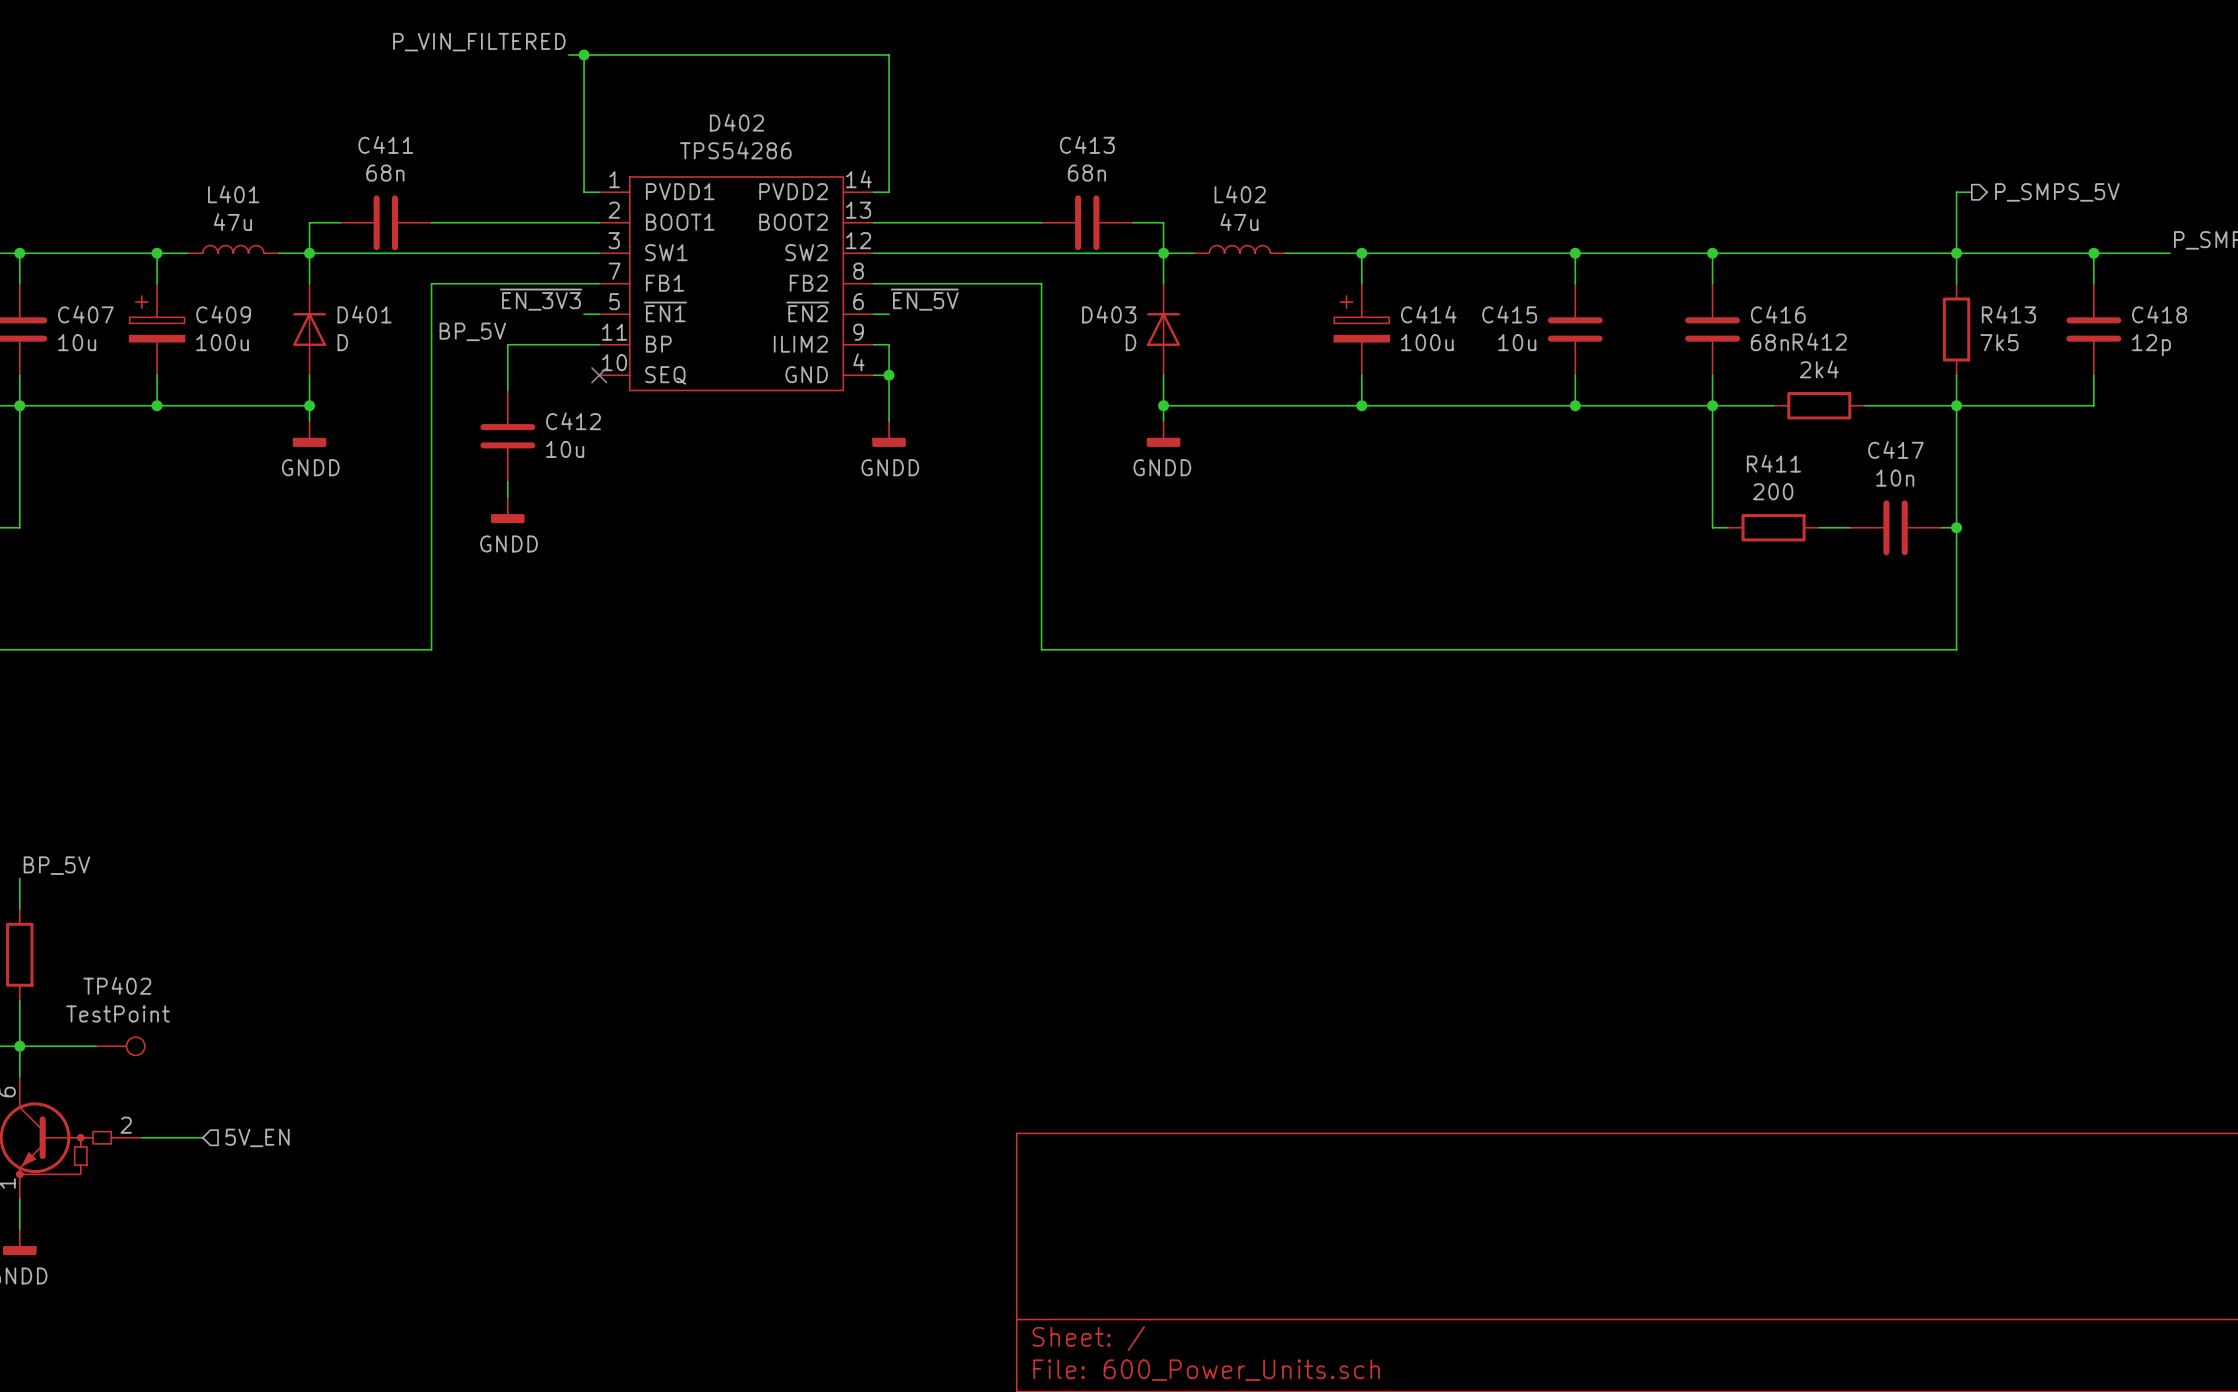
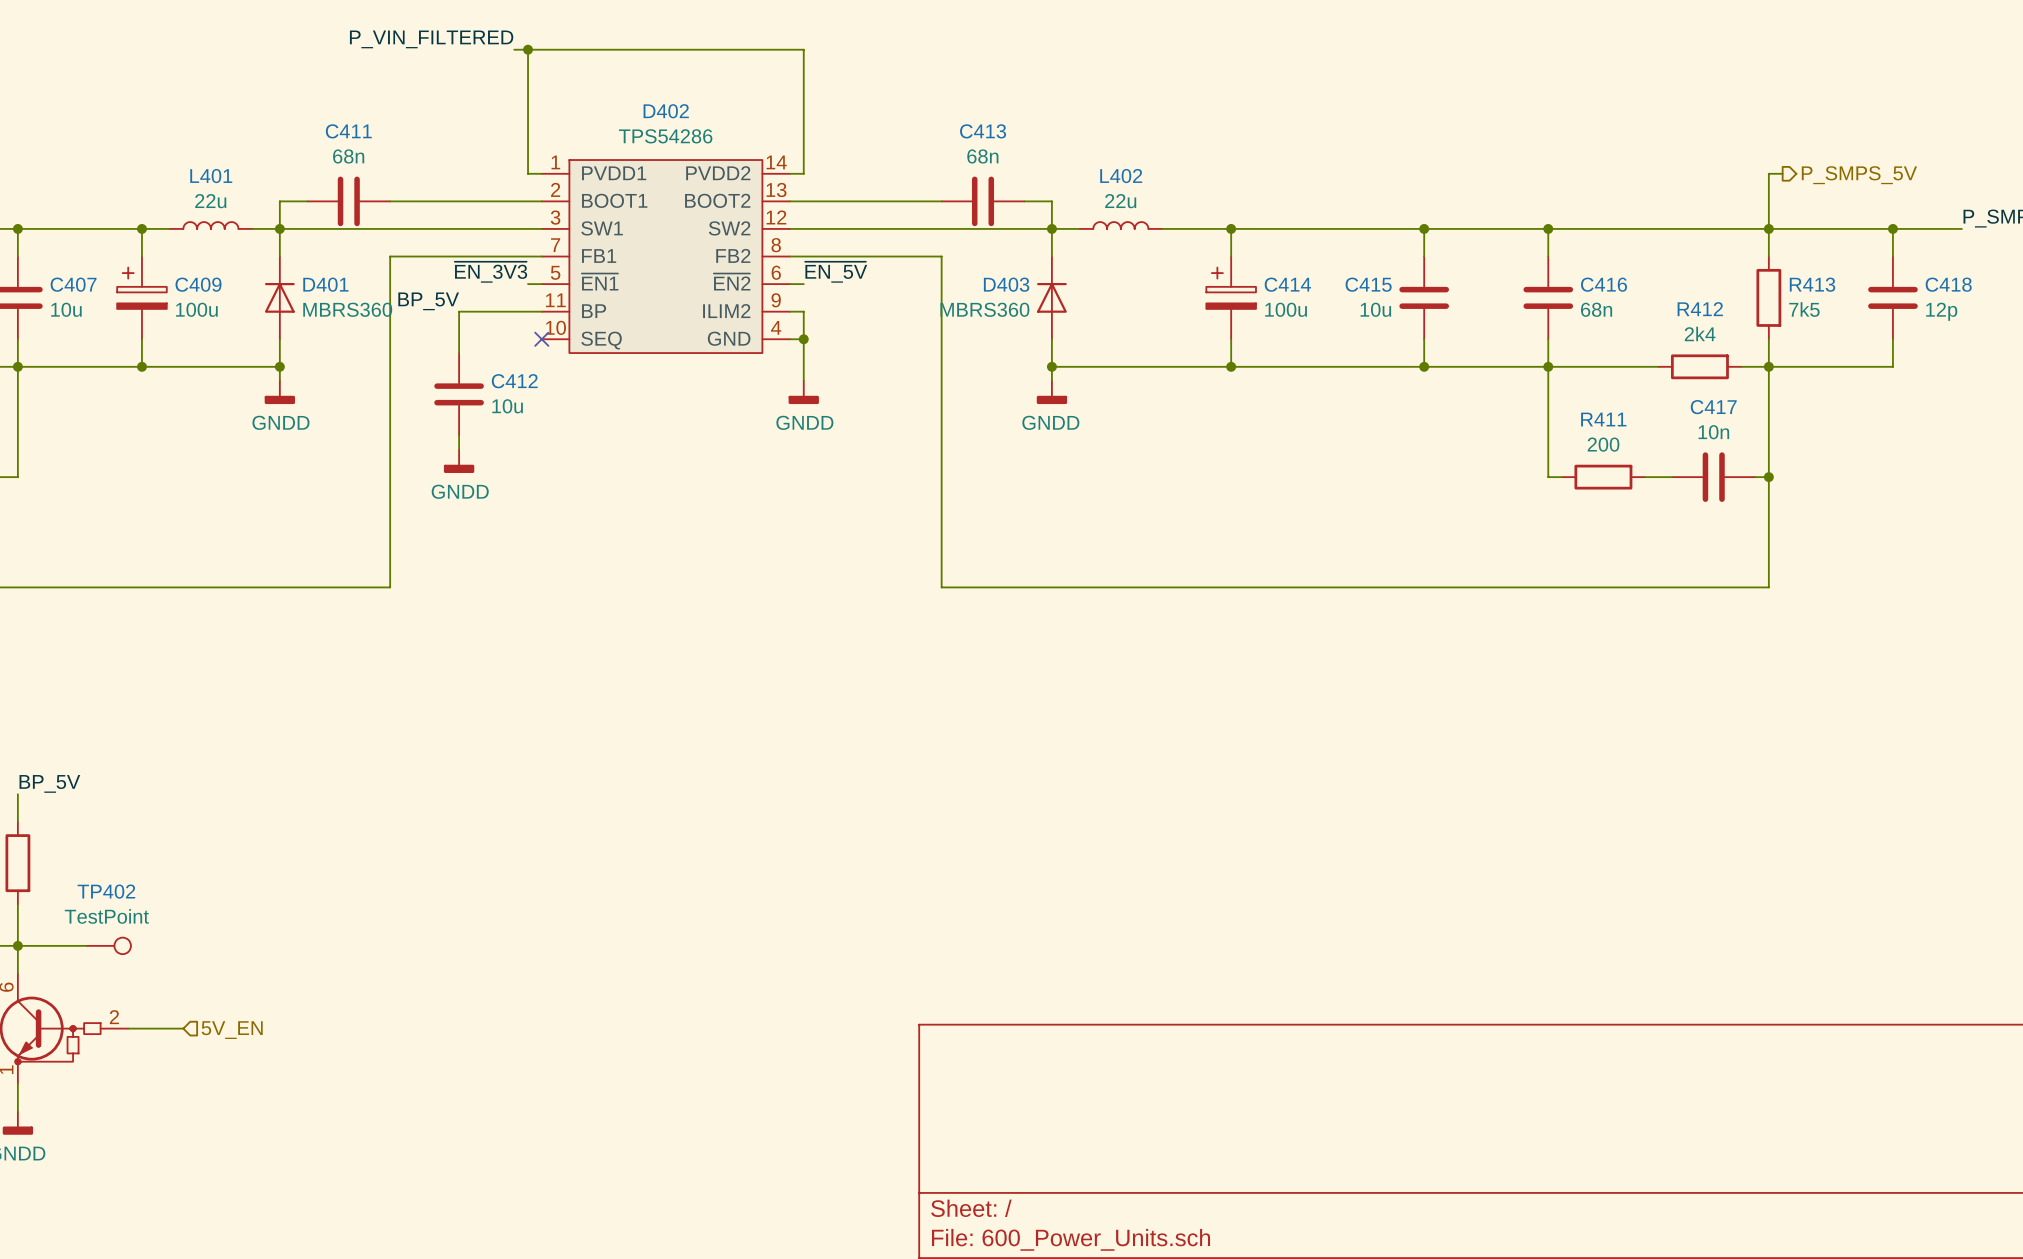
L401 value: 47u (232, 222) -> 22u (210, 201)
L402 value: 47u (1239, 222) -> 22u (1120, 201)
D401 value: D (342, 342) -> MBRS360 (347, 309)
D403 value: D (1131, 342) -> MBRS360 (984, 309)
R412 position: (1819, 405) -> (1699, 366)
wire: (1865, 405) (1926, 405) -> (1603, 366) (1658, 366)

